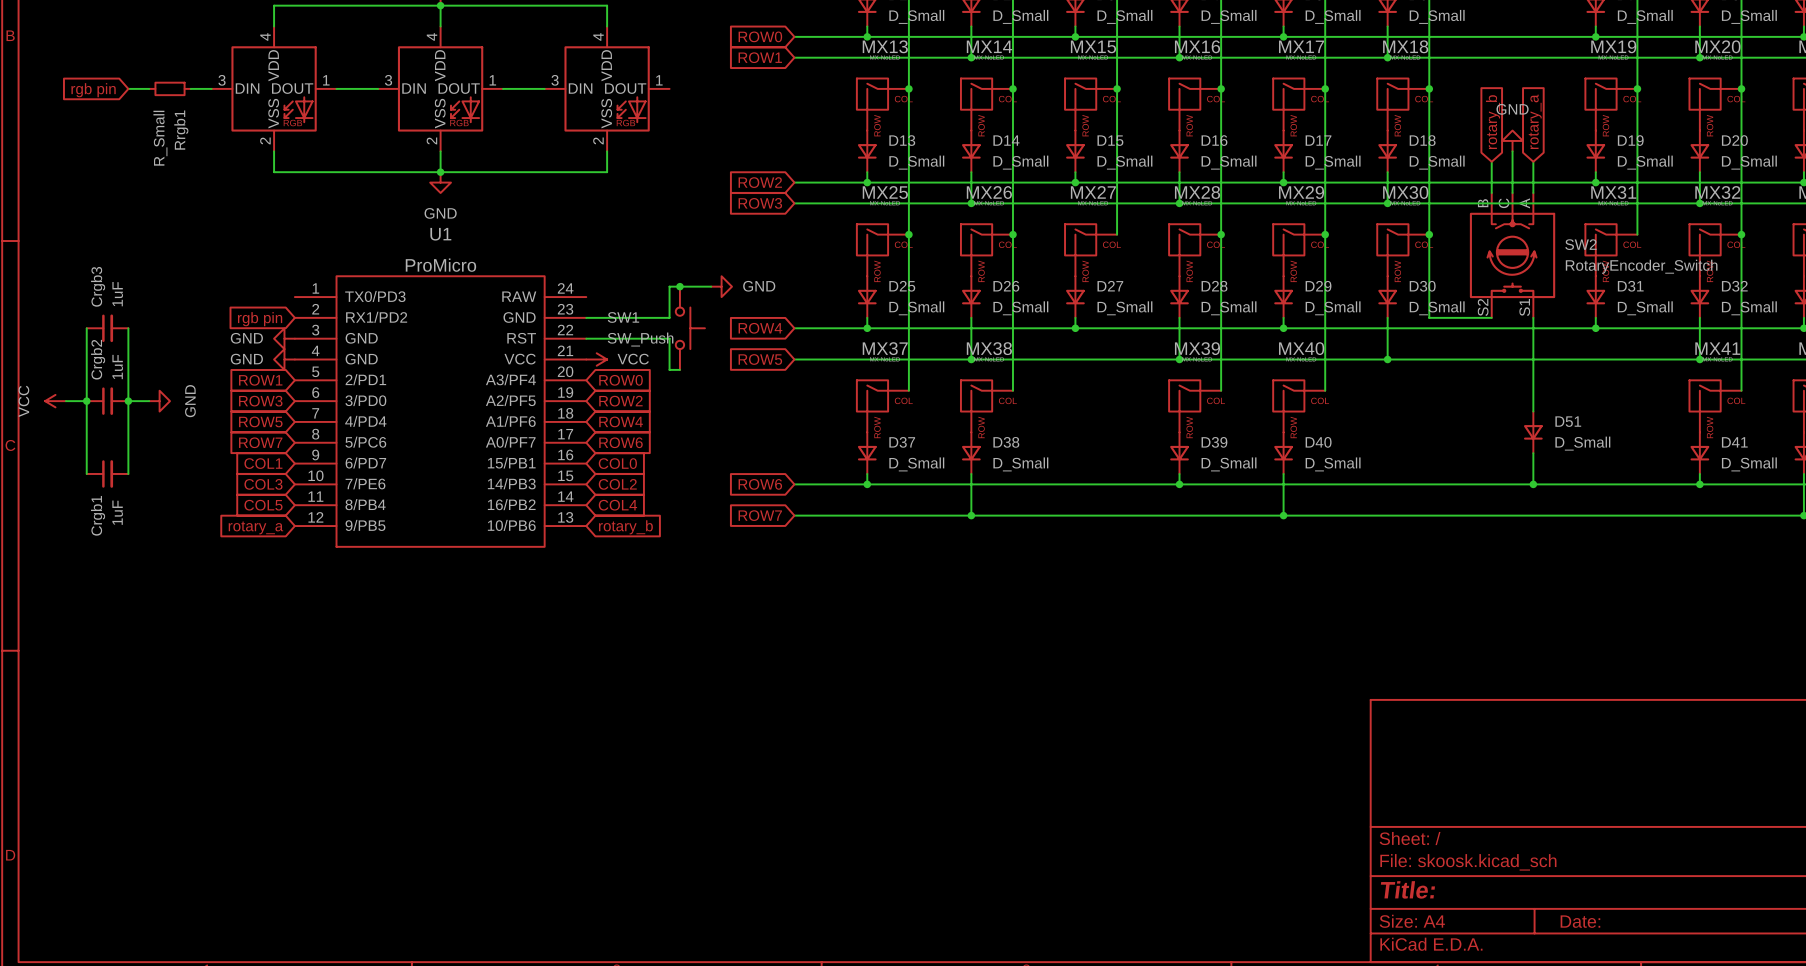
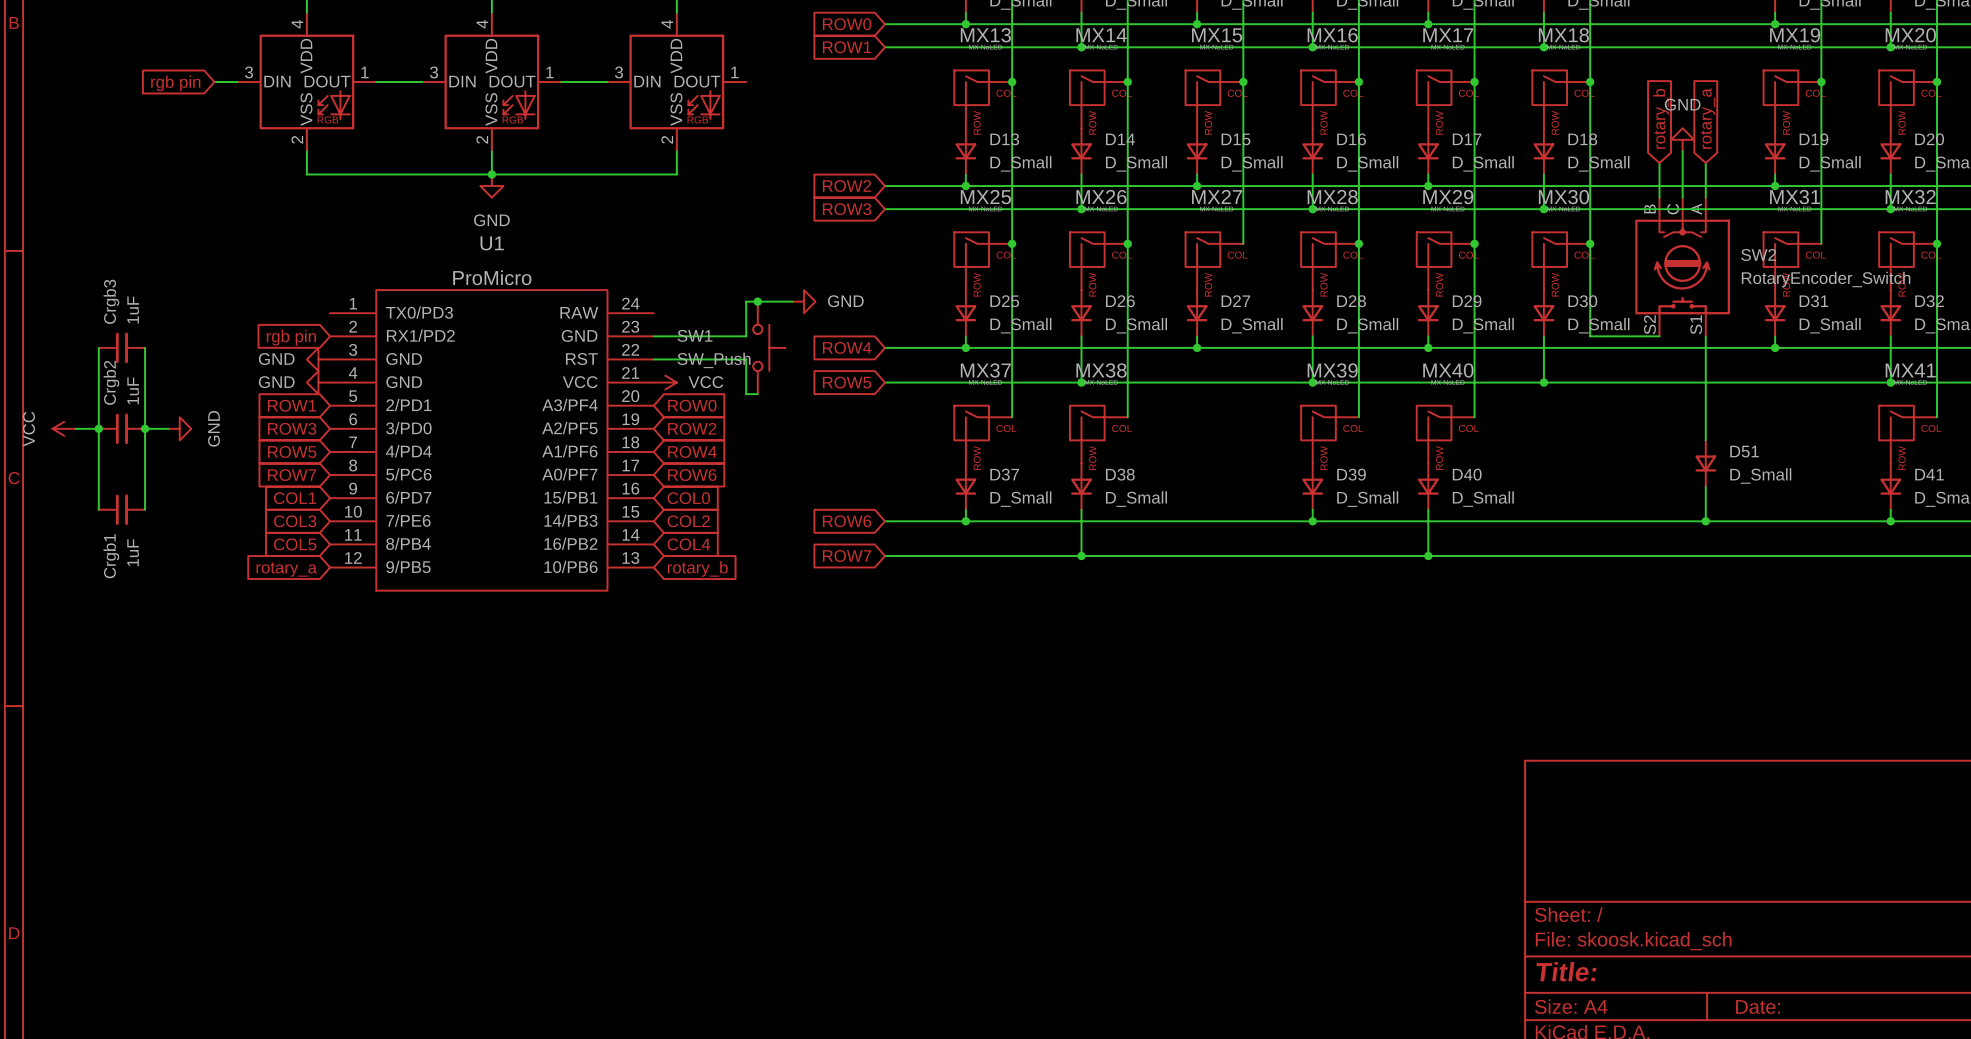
wire: (128, 88) (149, 88) -> none
Rrgb1: R_Small (170, 88) -> none
global label position: rgb pin (93, 90) -> rgb pin (175, 83)

